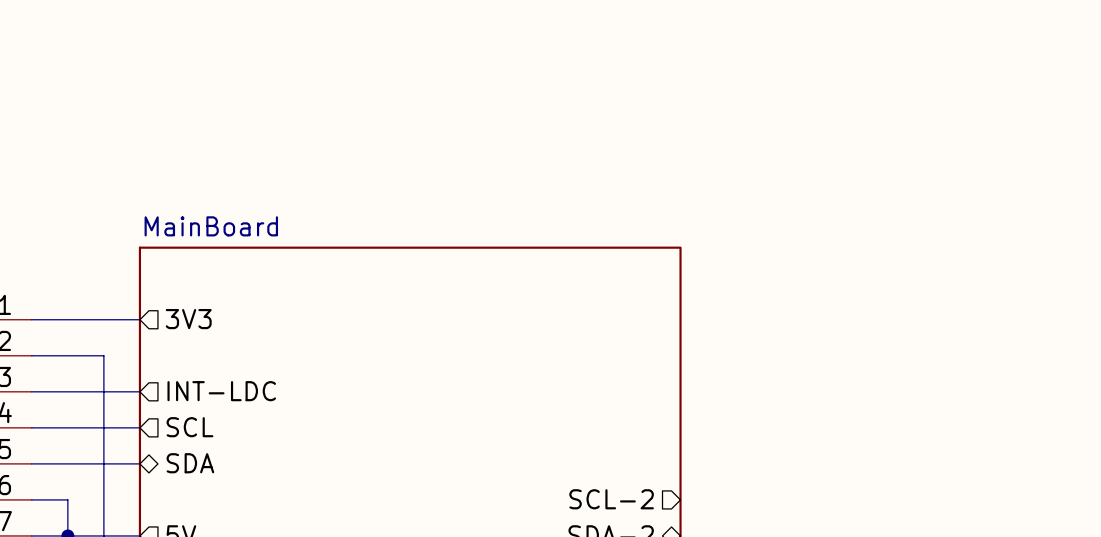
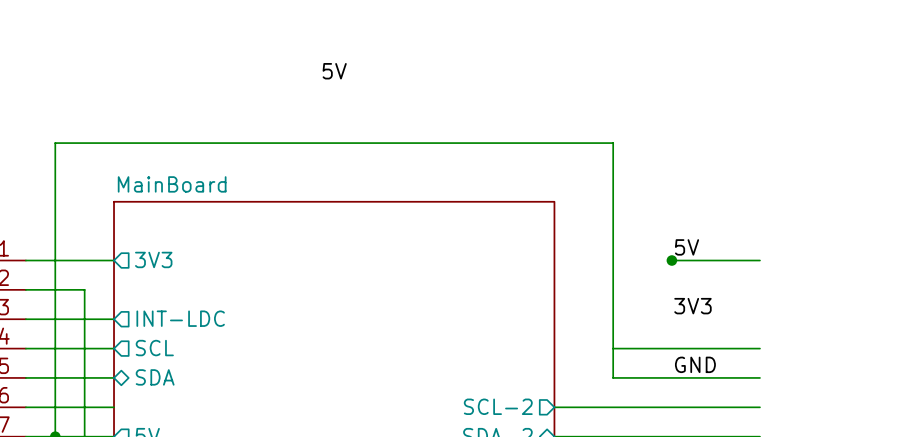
label: none -> 5V (334, 71)
label: none -> 5V (687, 247)
wire: none -> (671, 260) (759, 260)
junction: none -> (671, 260)
label: none -> 3V3 (692, 306)
wire: none -> (613, 348) (759, 348)
label: none -> GND (695, 364)
wire: none -> (759, 377) (613, 377) (613, 143) (55, 143) (55, 407) (114, 407)
wire: none -> (554, 407) (759, 407)
wire: none -> (554, 436) (759, 436)

